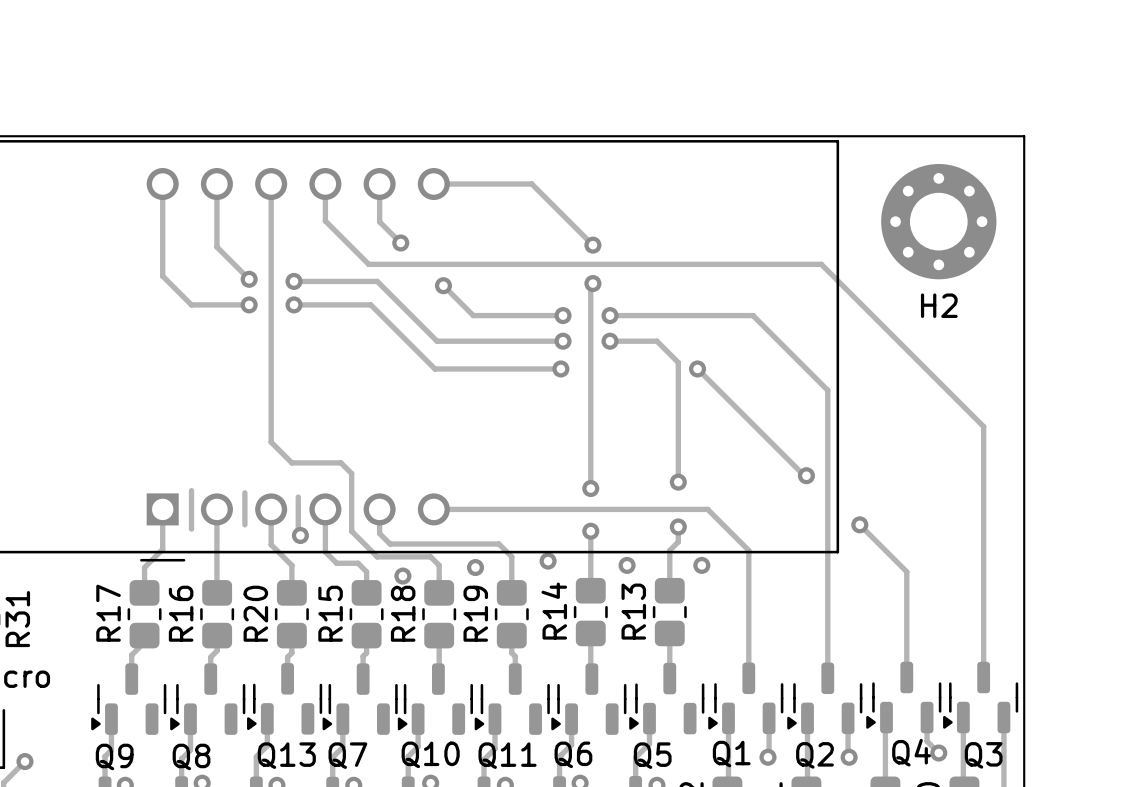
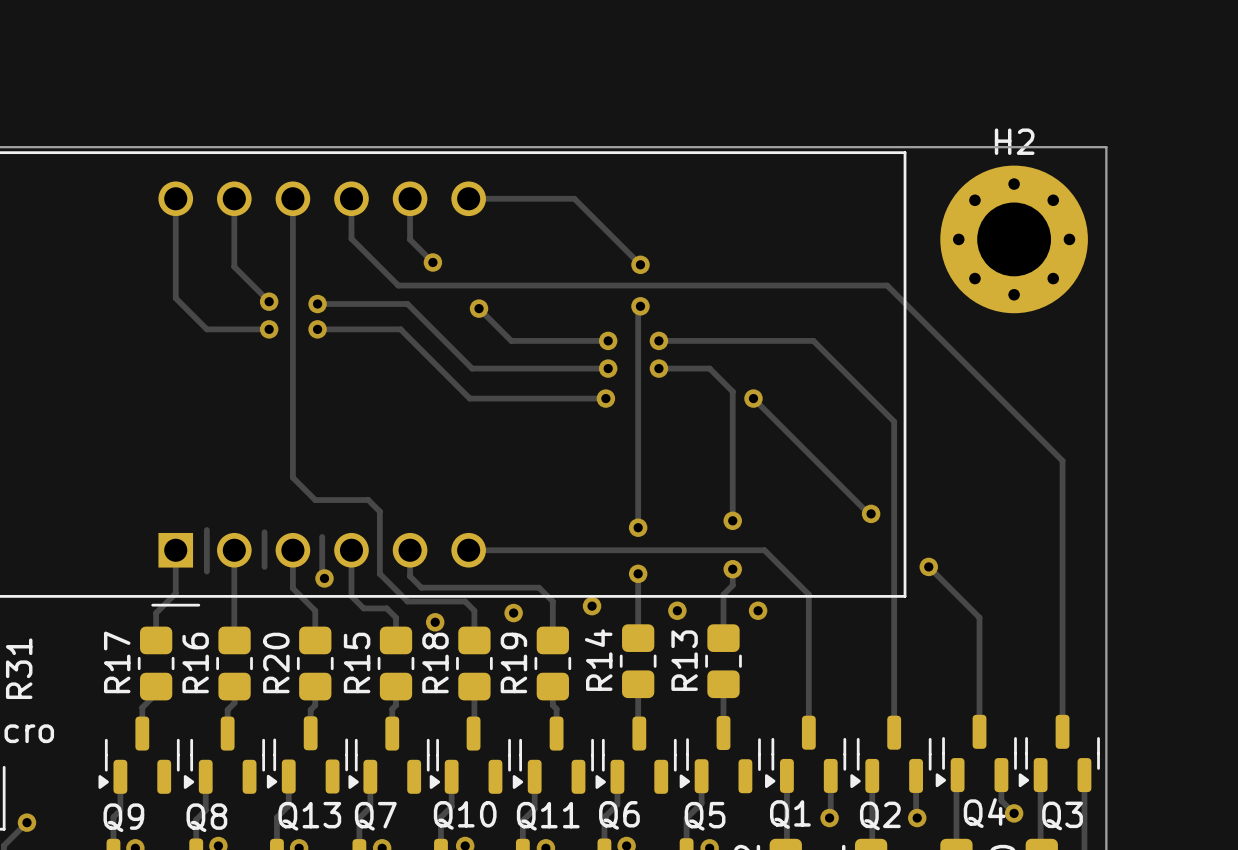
H2 footprint: [881, 164, 997, 280] -> [940, 165, 1088, 314]
H2 name position: H2 (939, 305) -> H2 (1014, 141)

